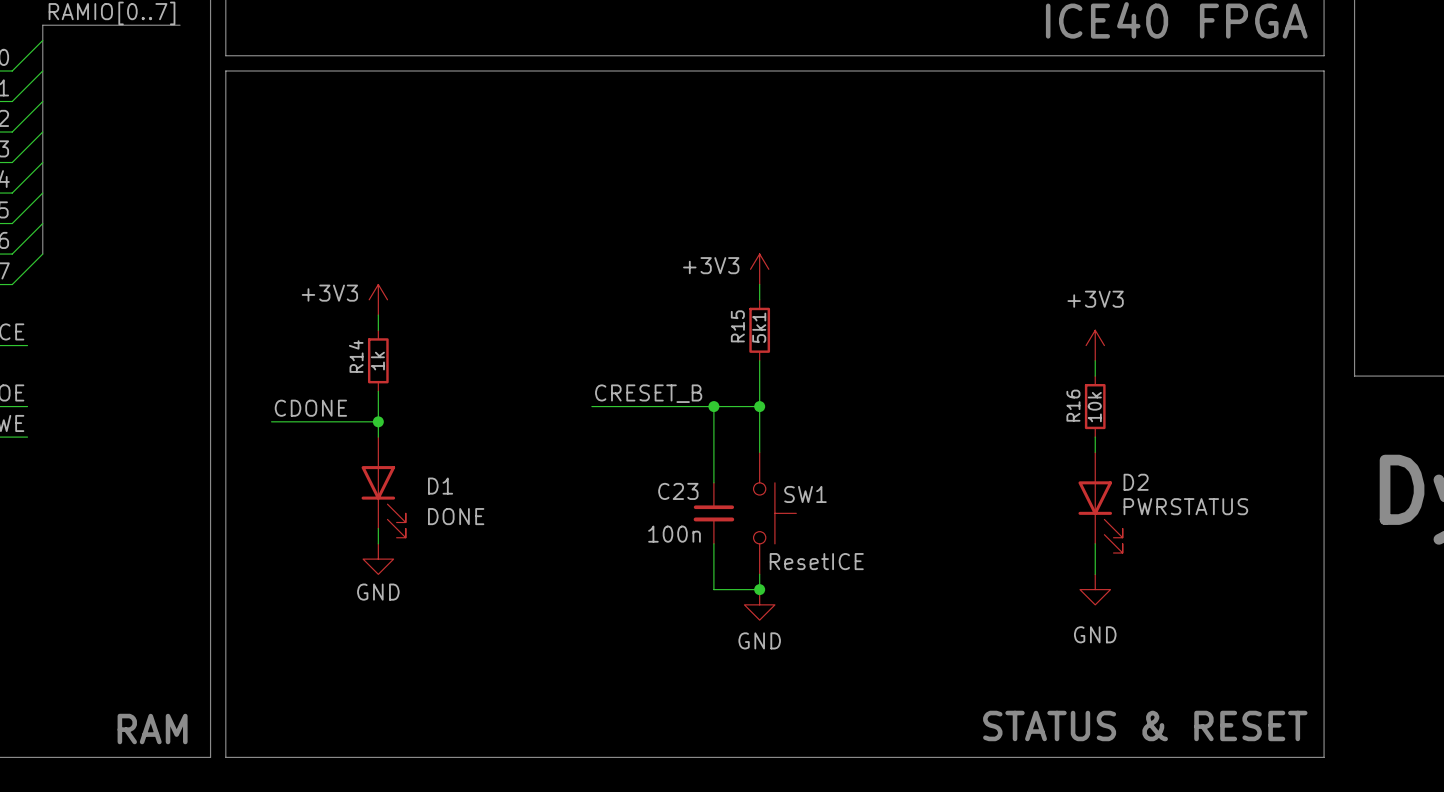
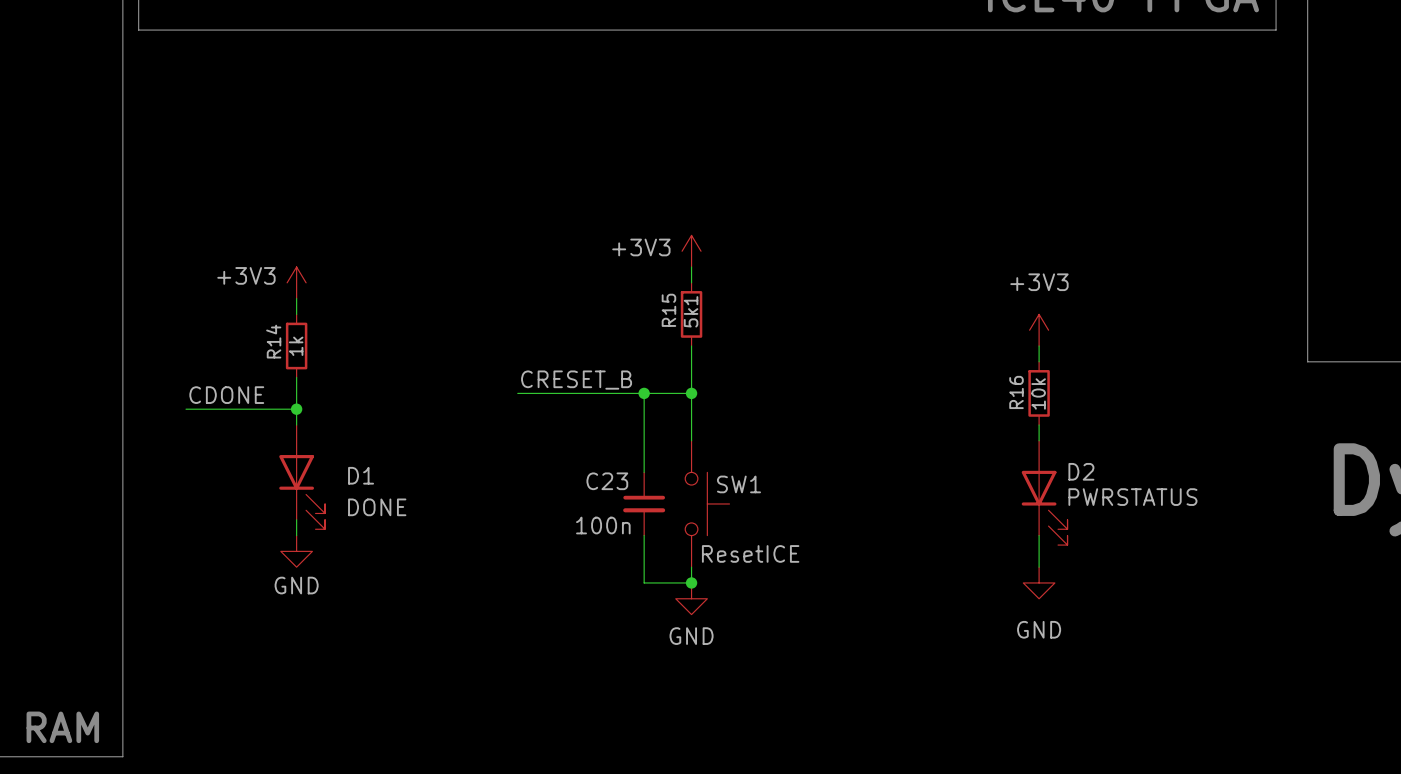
line: (225, 70) (1324, 70) (1324, 757) (225, 757) (225, 70) -> none
text: STATUS & RESET (1145, 725) -> none

